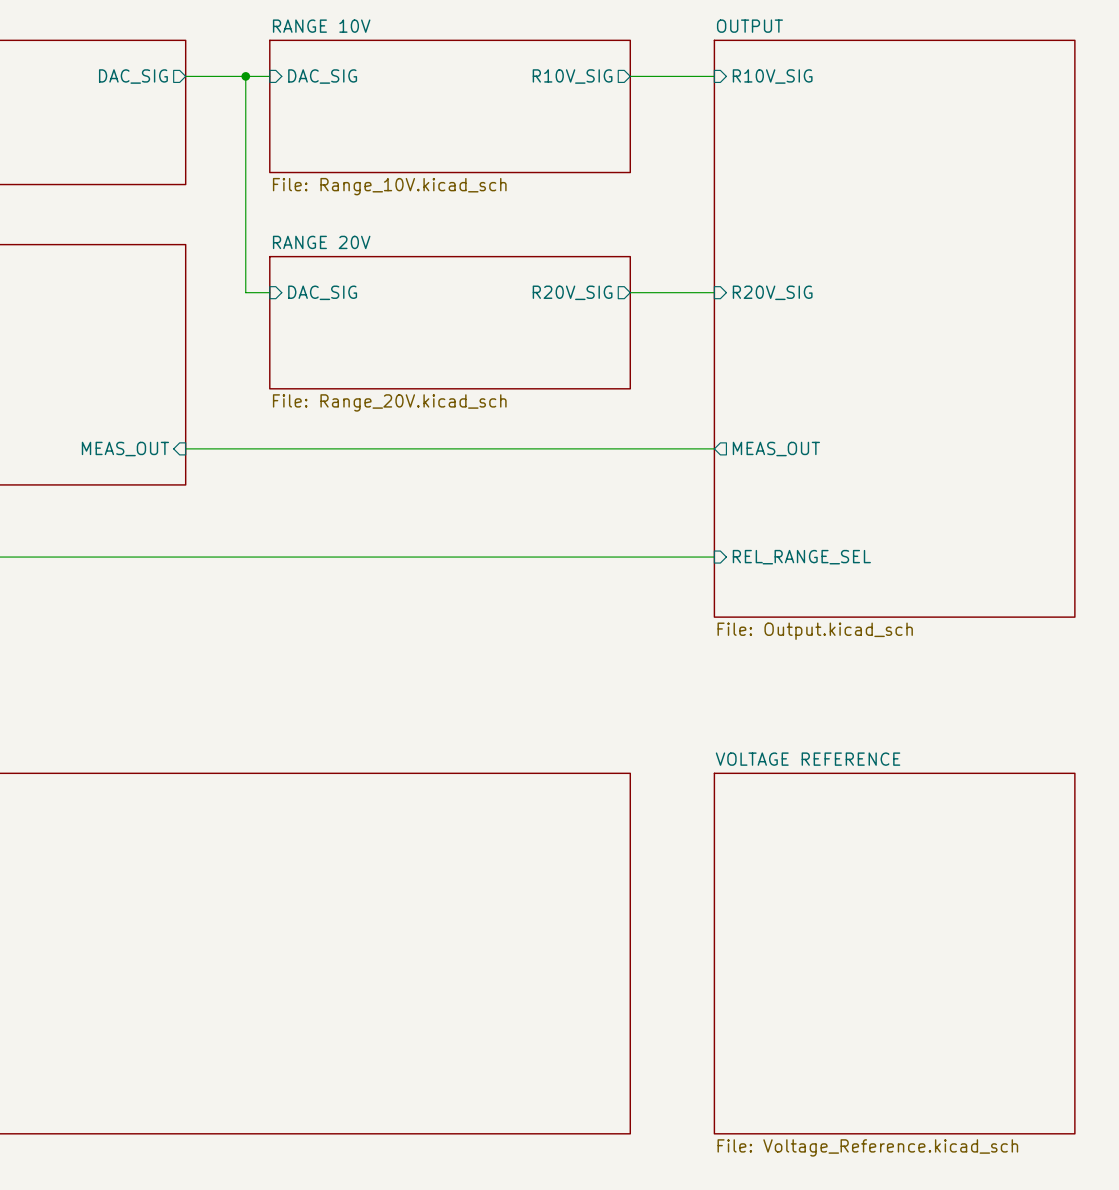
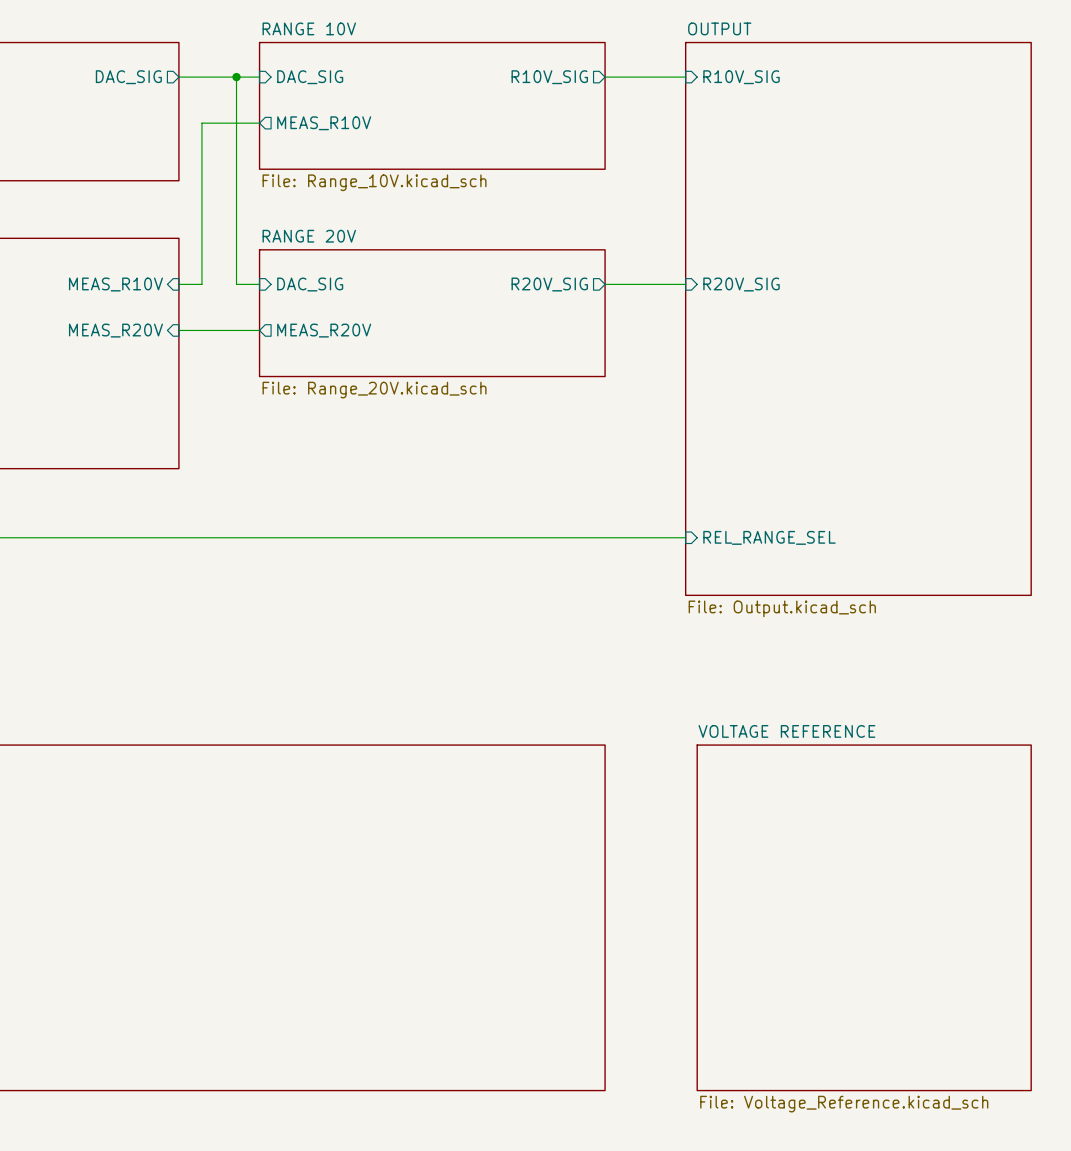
wire: none -> (259, 123) (201, 123) (201, 284) (178, 284)
sheet pin: none -> MEAS_R10V (324, 123)
sheet pin: none -> MEAS_R10V (115, 284)
sheet pin: none -> MEAS_R20V (115, 330)
wire: none -> (178, 330) (259, 330)
sheet pin: none -> MEAS_R20V (324, 330)
wire: (185, 448) (714, 448) -> none
sheet pin: MEAS_OUT (125, 449) -> none
sheet pin: MEAS_OUT (776, 449) -> none
sheet VOLTAGE REFERENCE shape: [713, 772, 1076, 1135] -> [696, 744, 1032, 1092]

